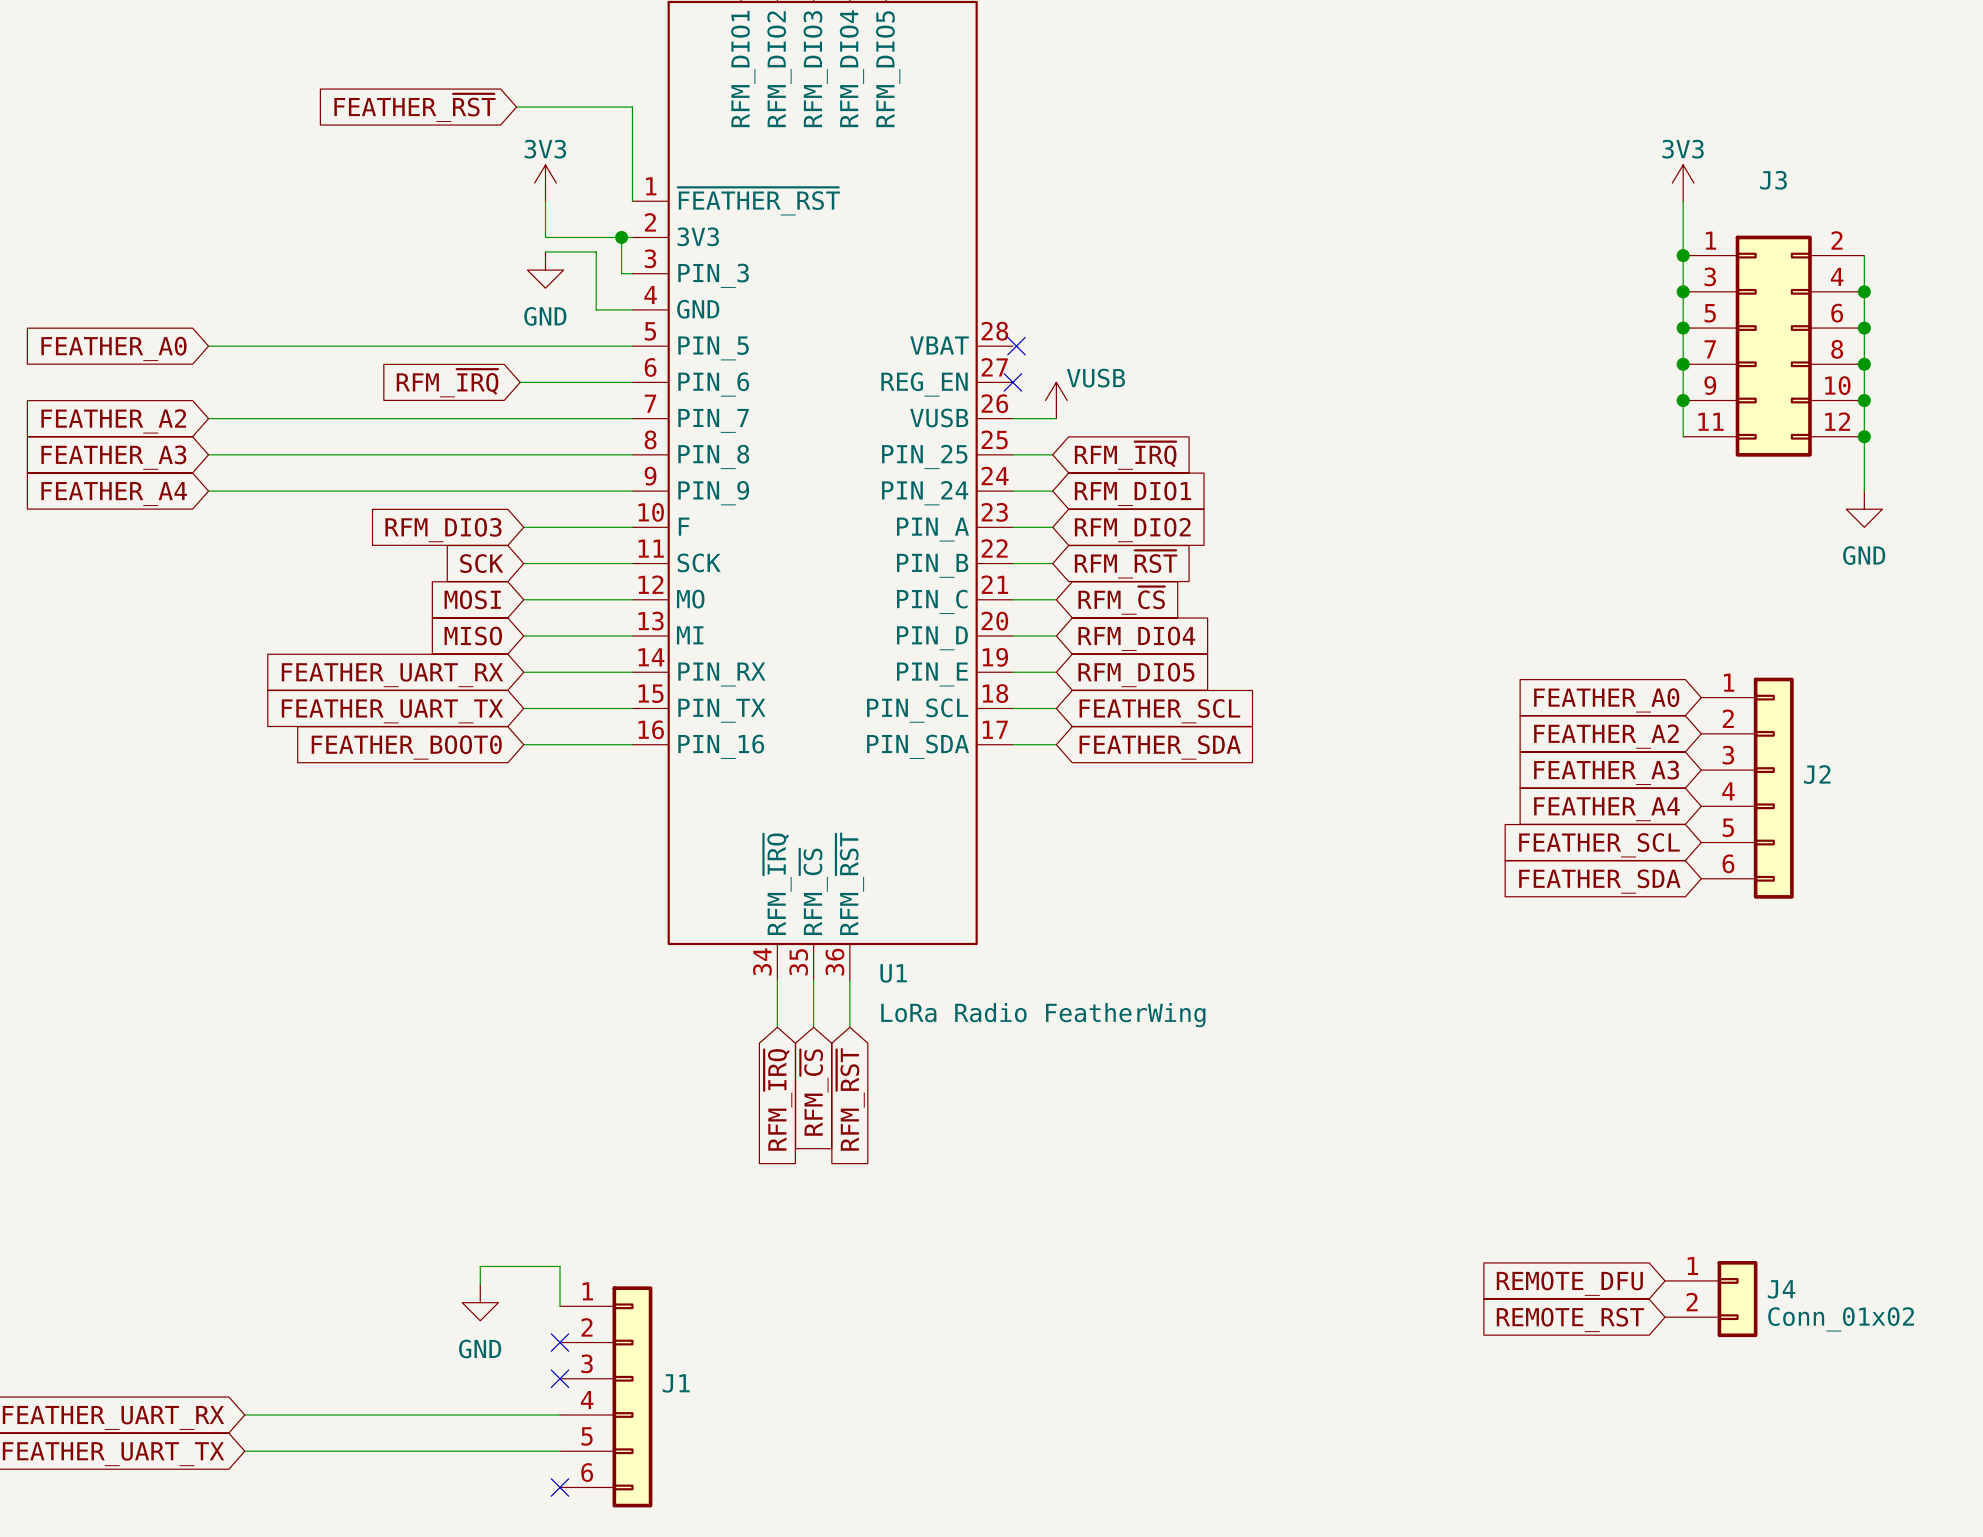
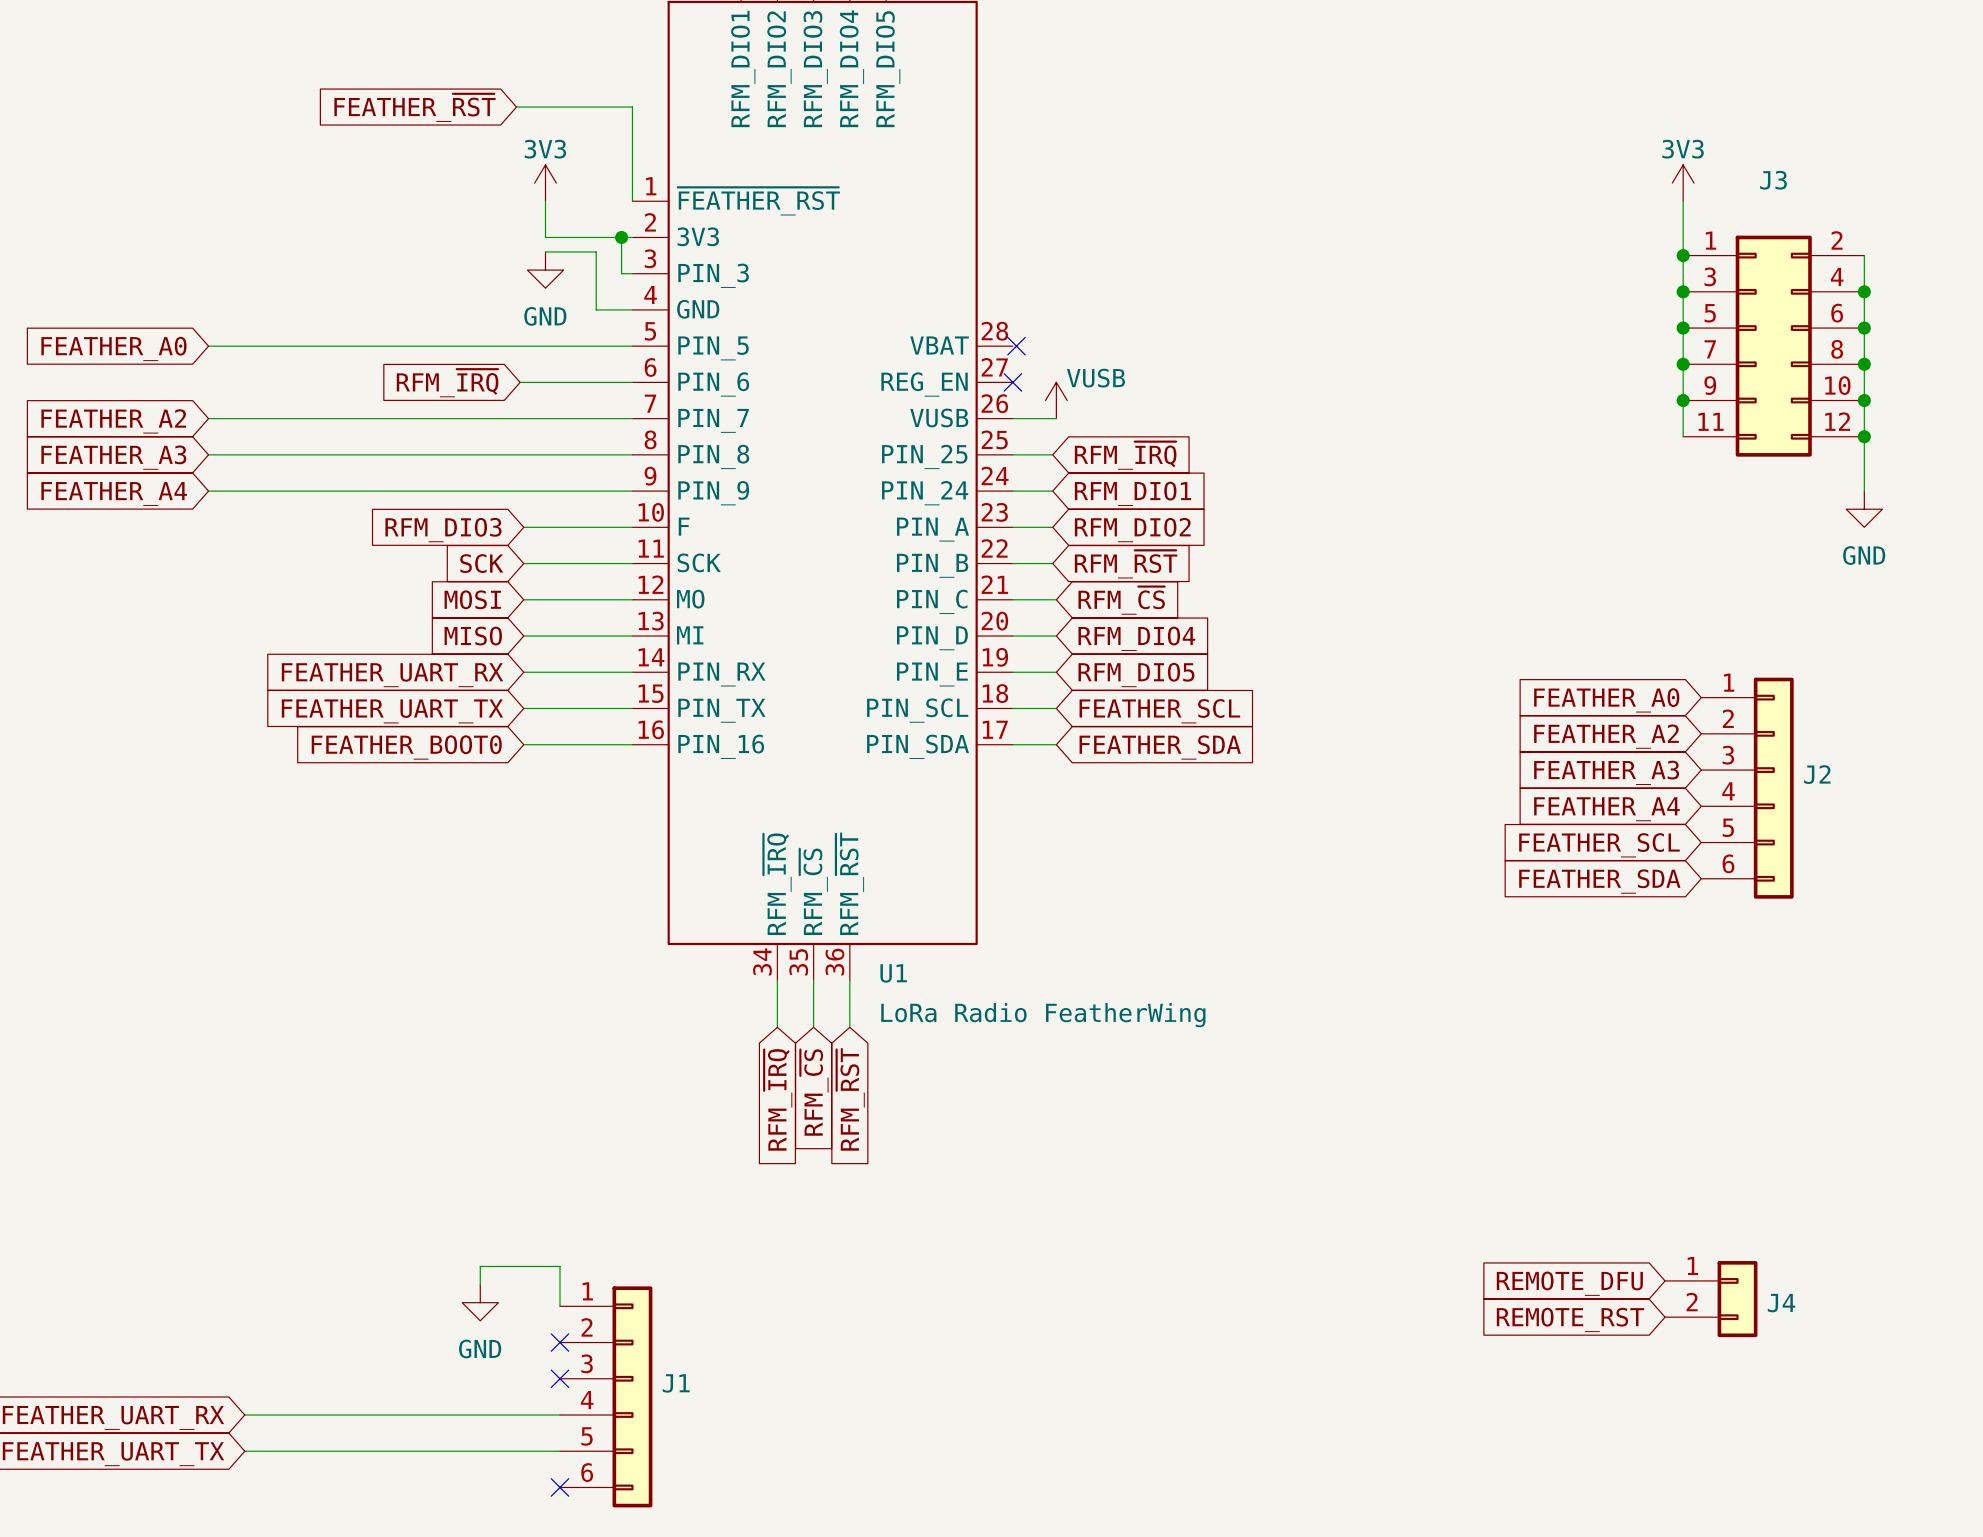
J4 name position: J4 (1781, 1289) -> J4 (1781, 1303)
J4 value: Conn_01x02 (1841, 1319) -> none

